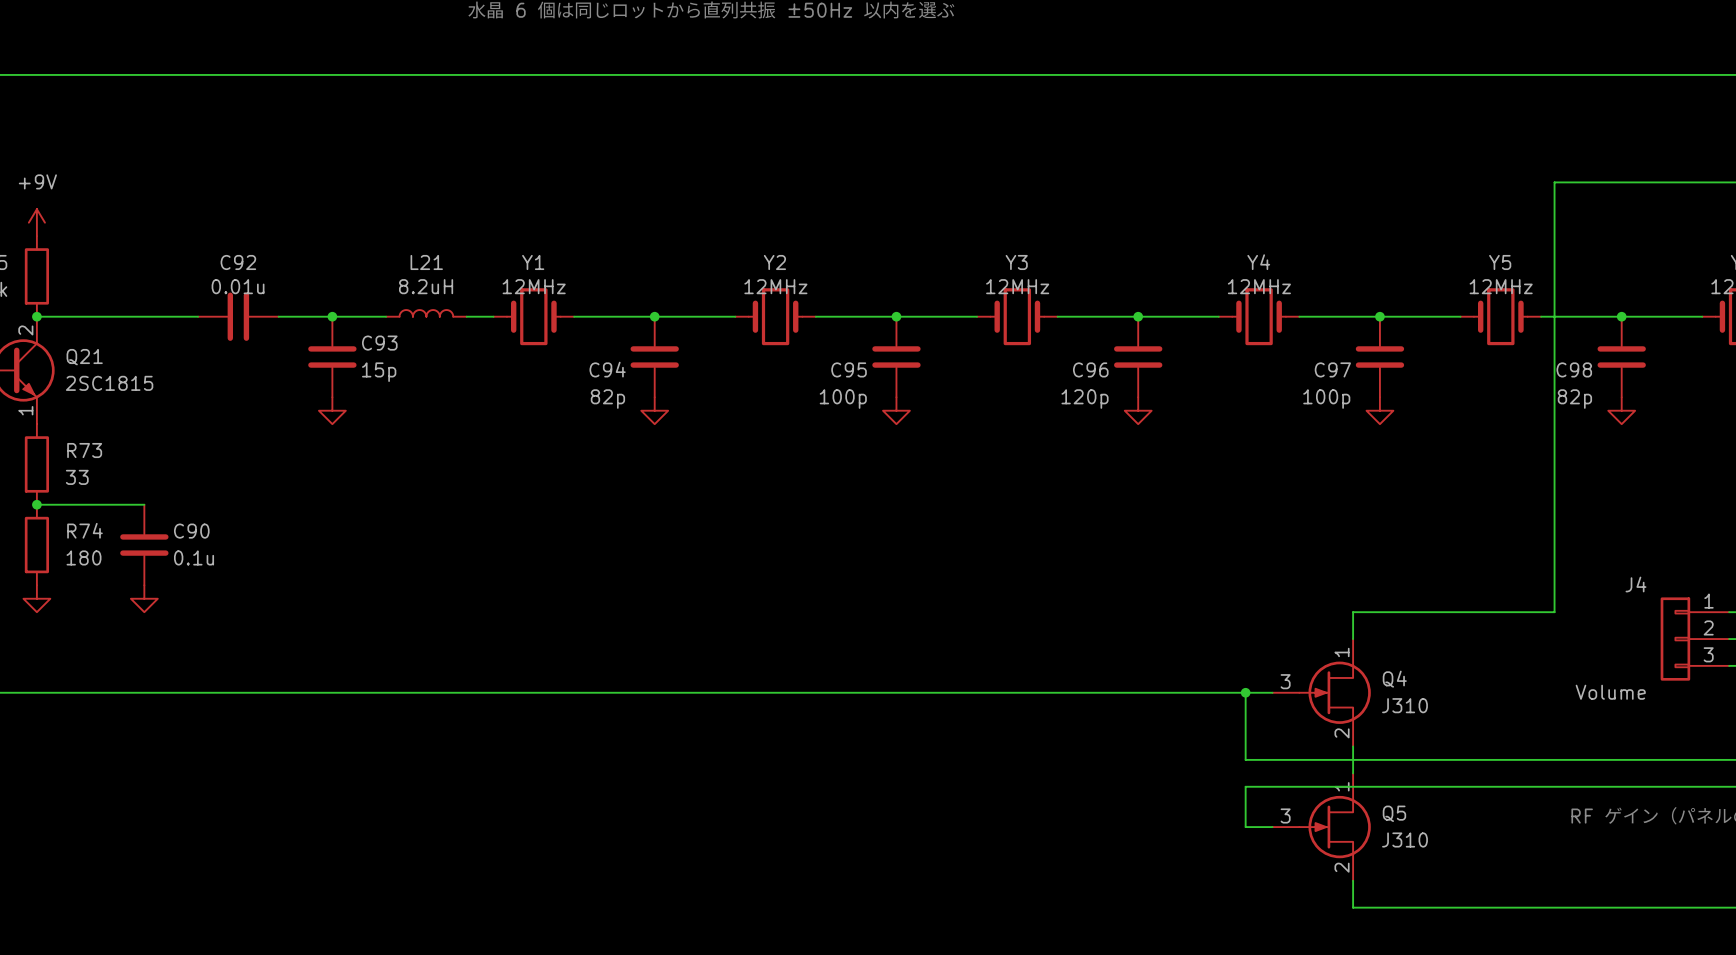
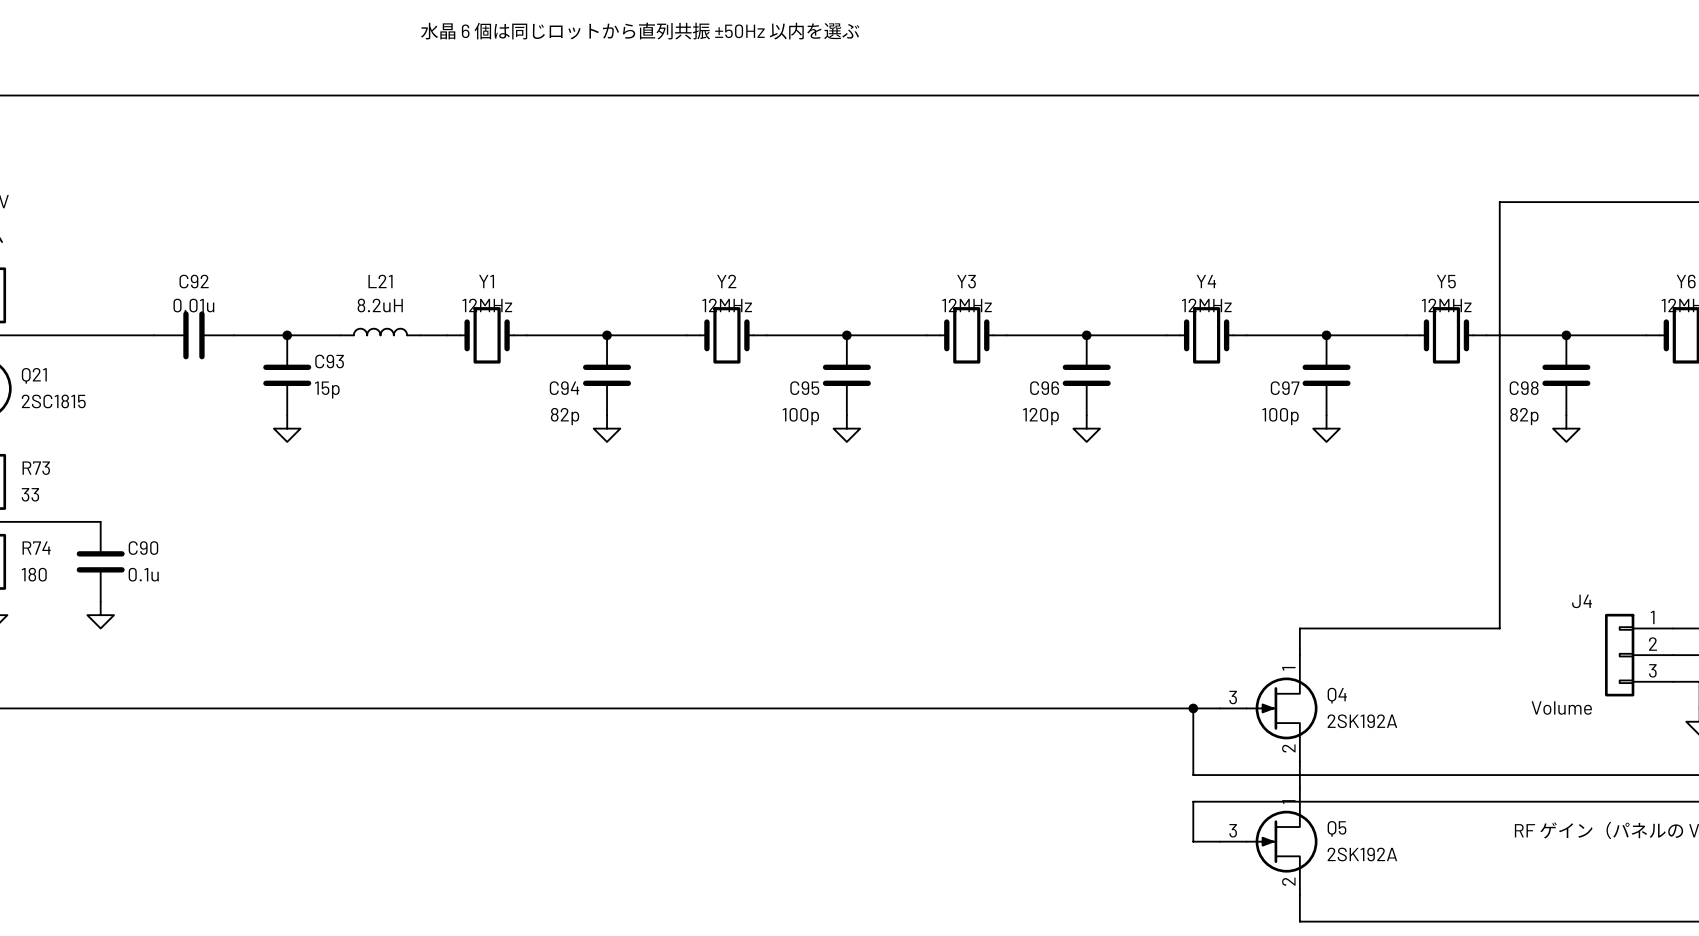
Q4 value: J310 (1405, 705) -> 2SK192A (1362, 721)
Q5 value: J310 (1405, 839) -> 2SK192A (1362, 854)

